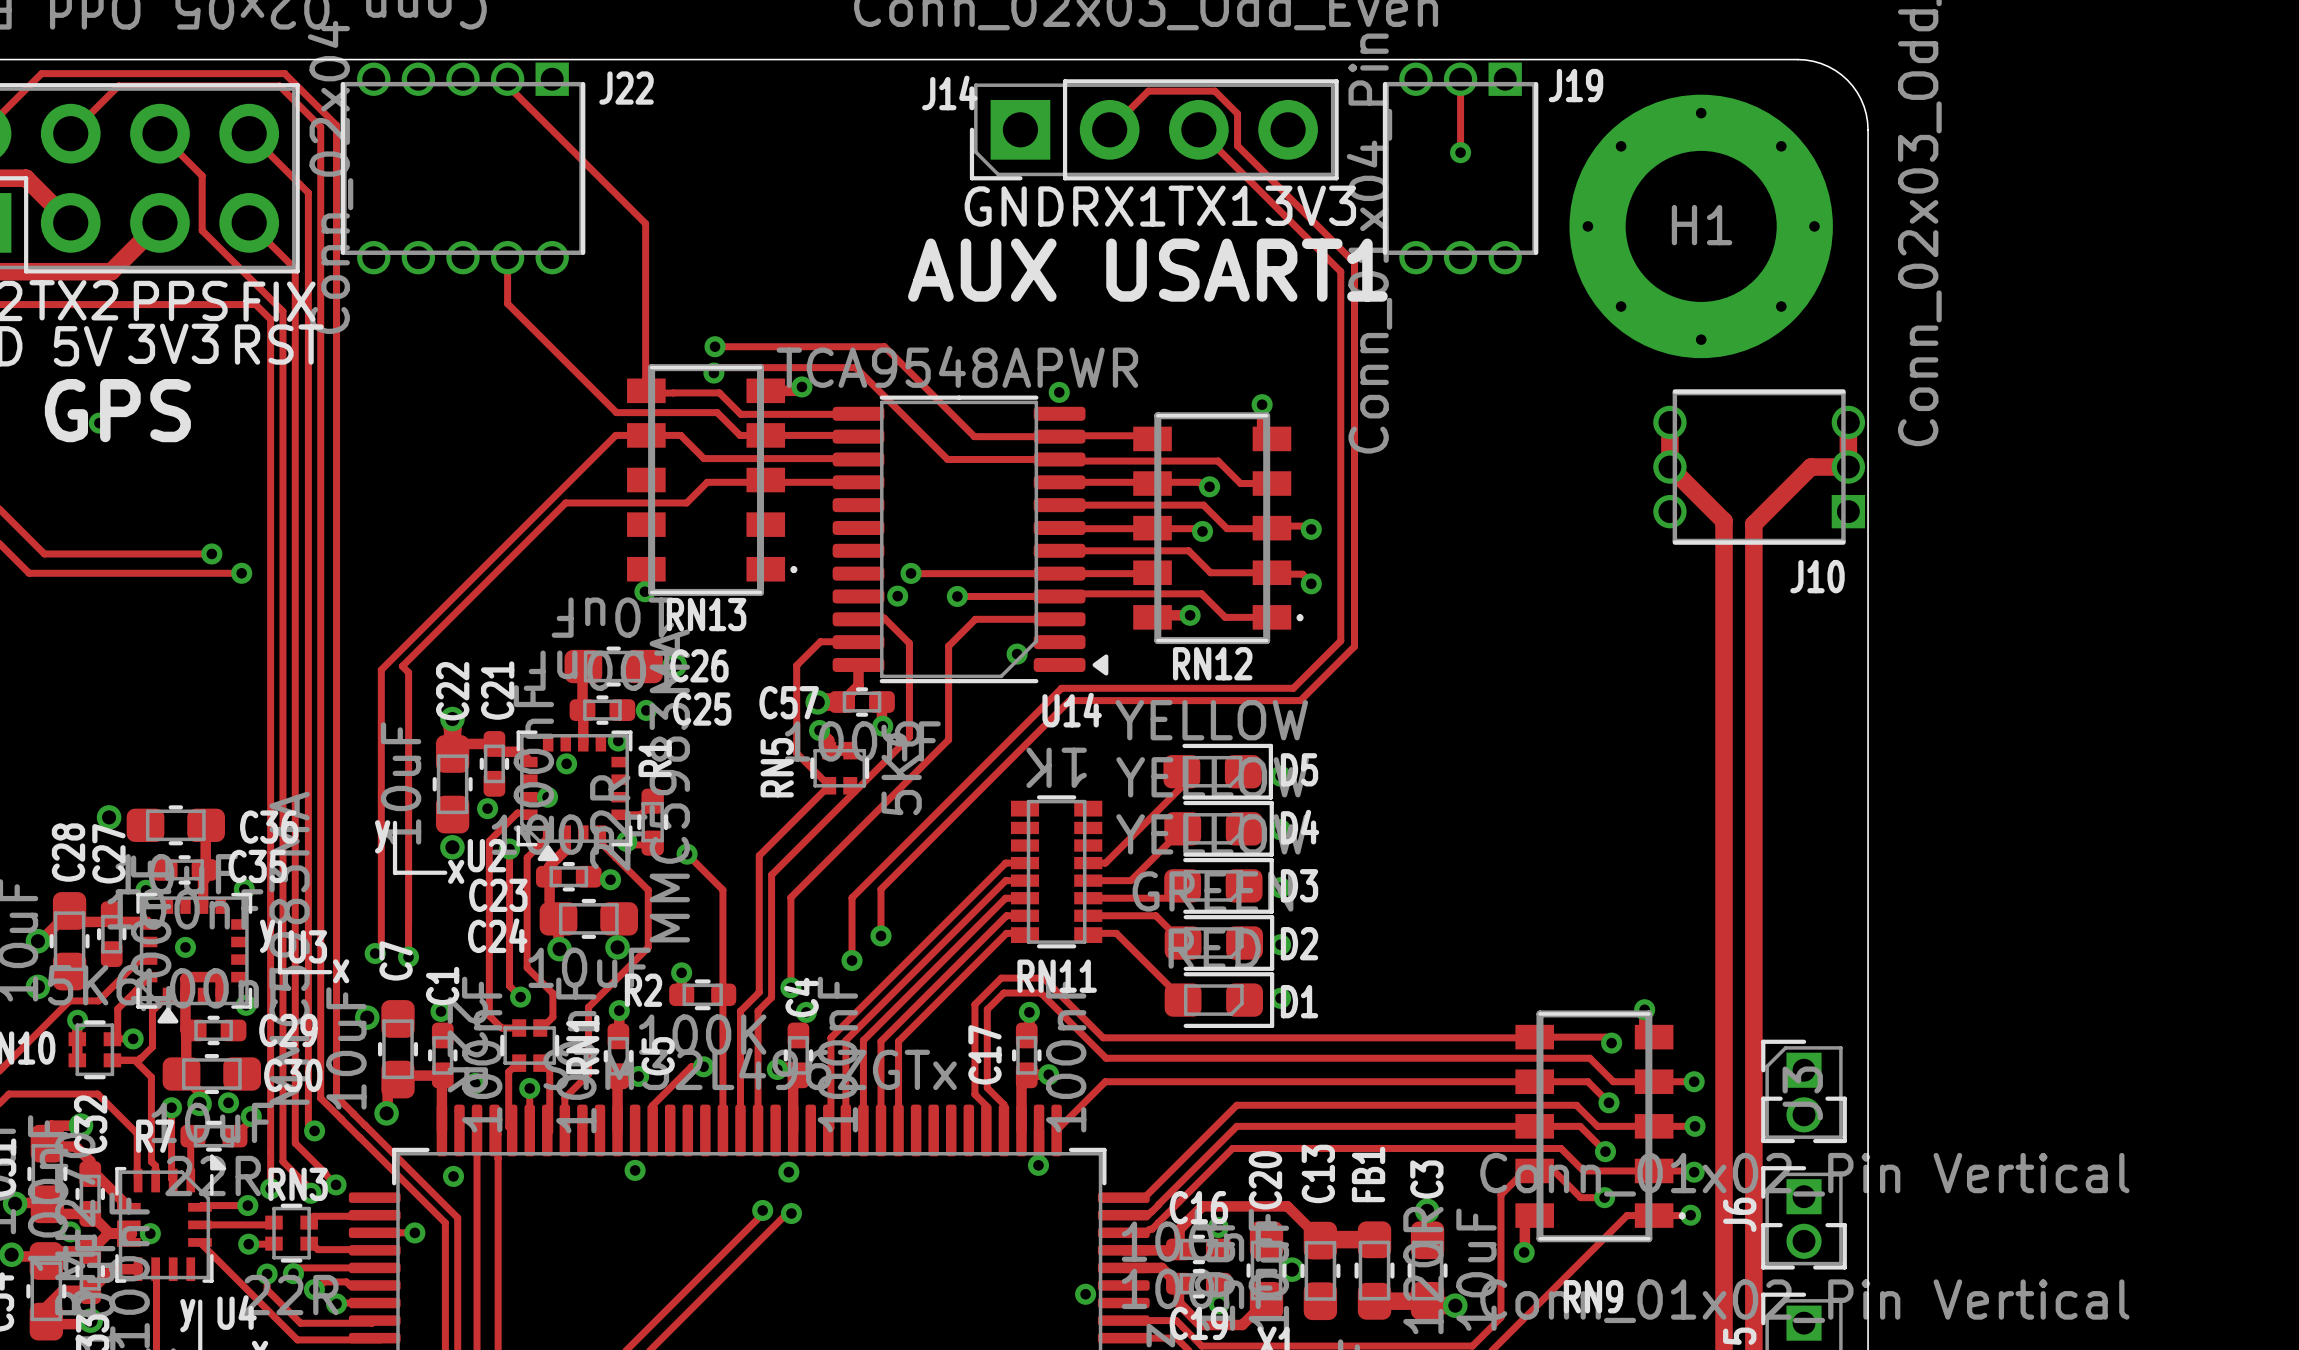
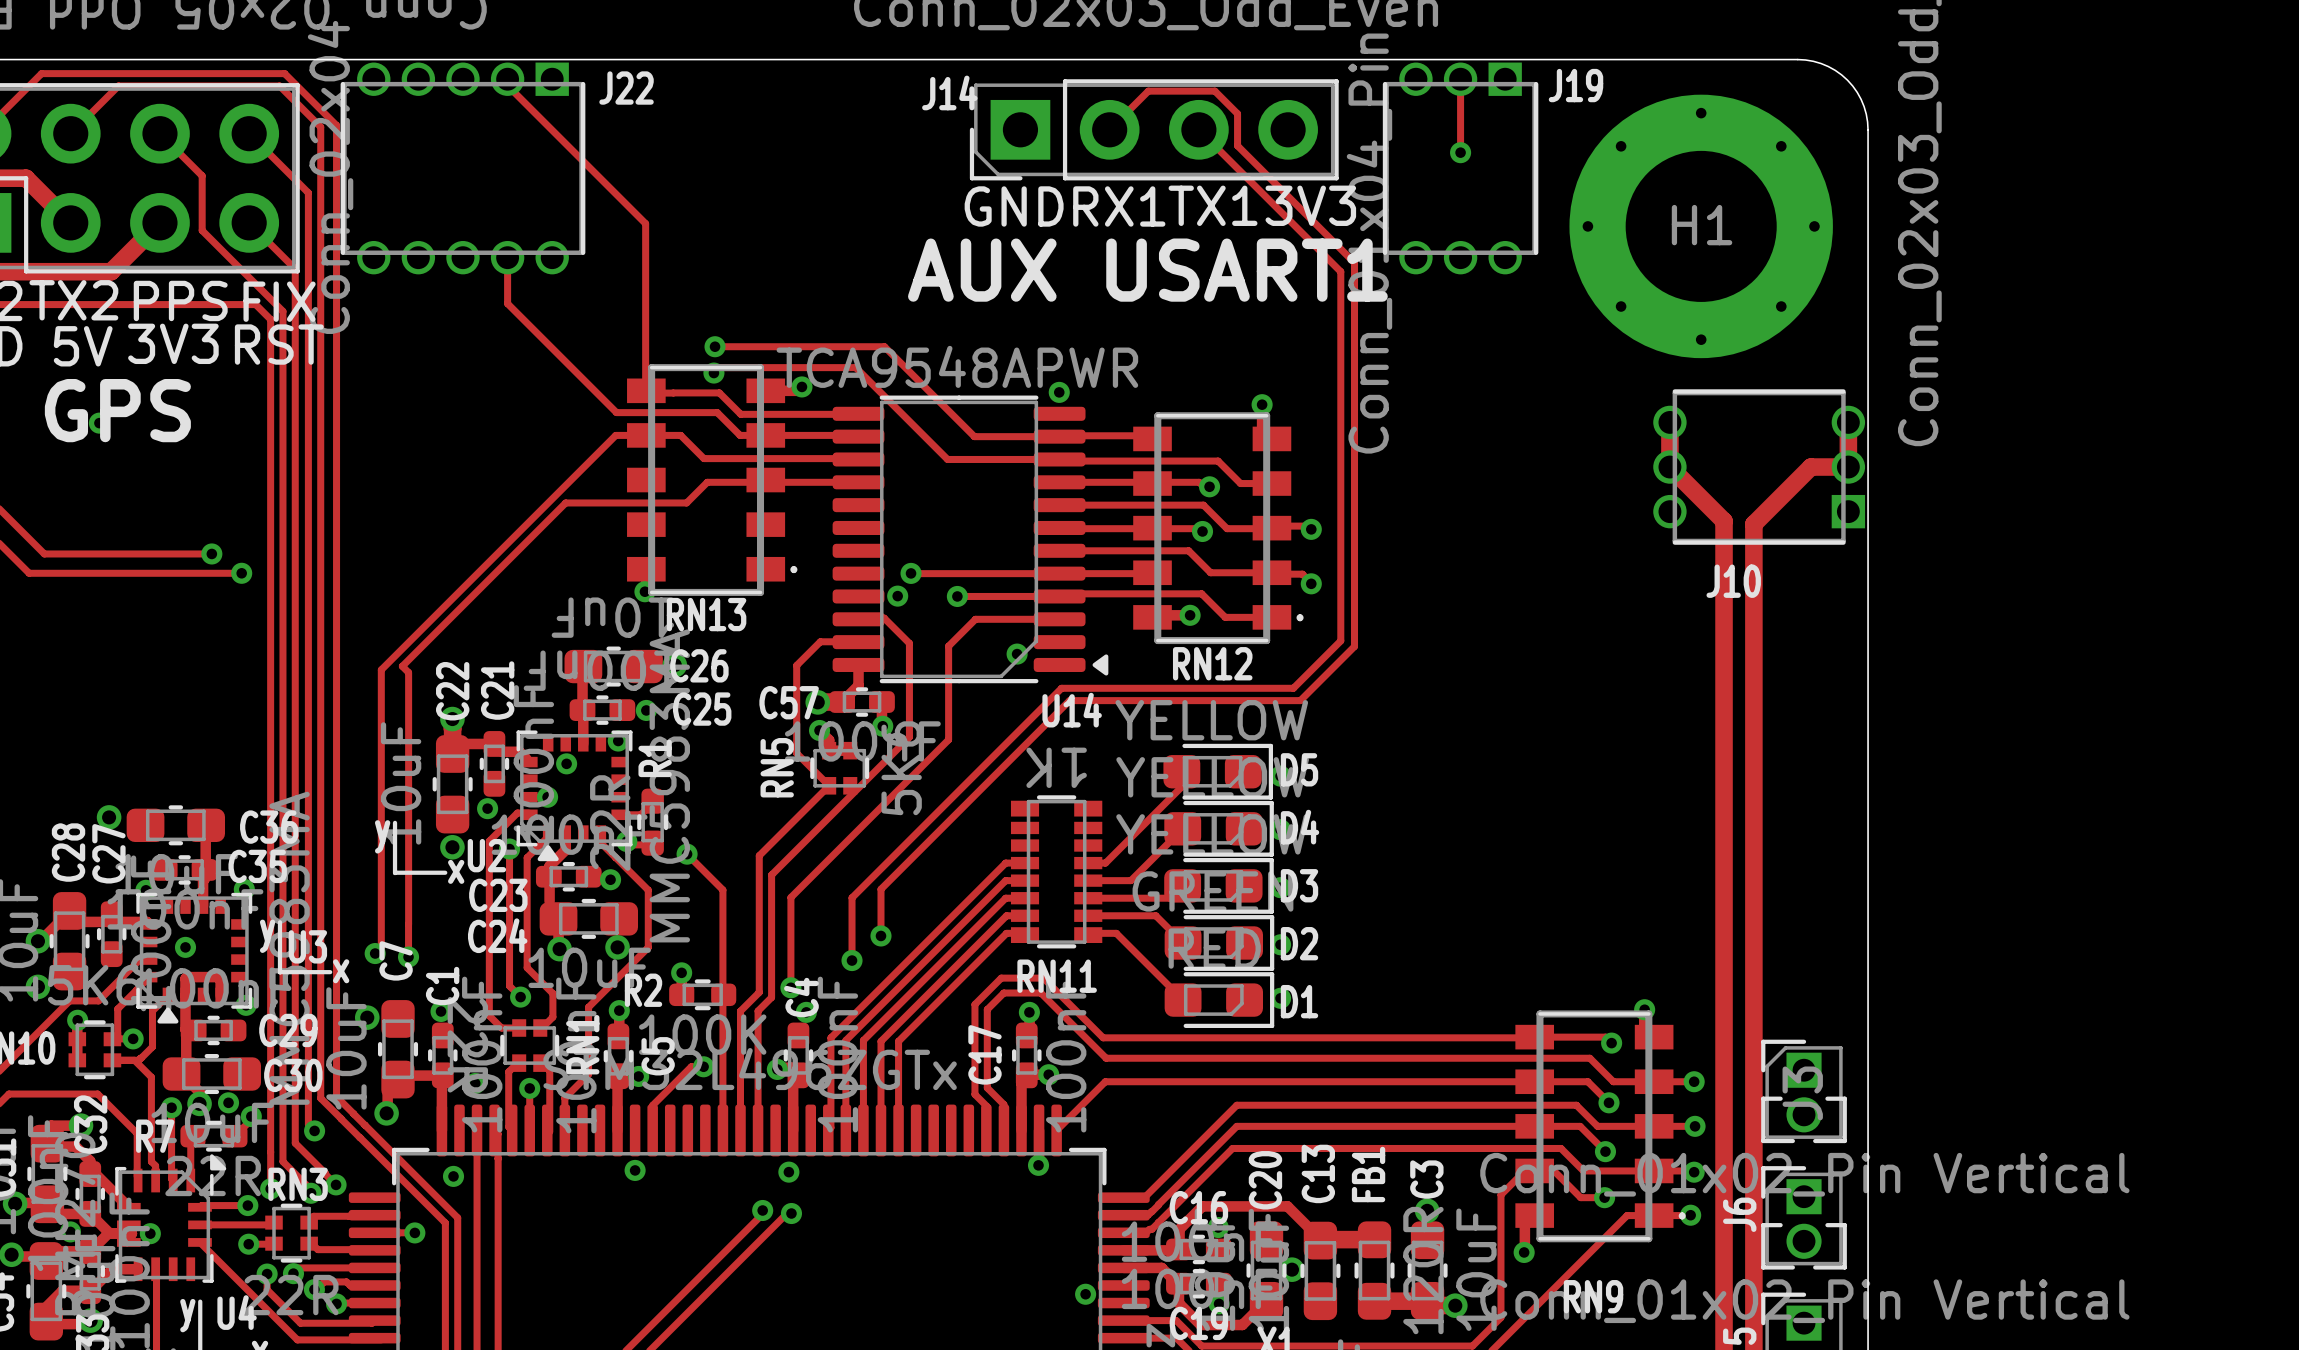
J10 name position: J10 (1817, 576) -> J10 (1733, 581)

